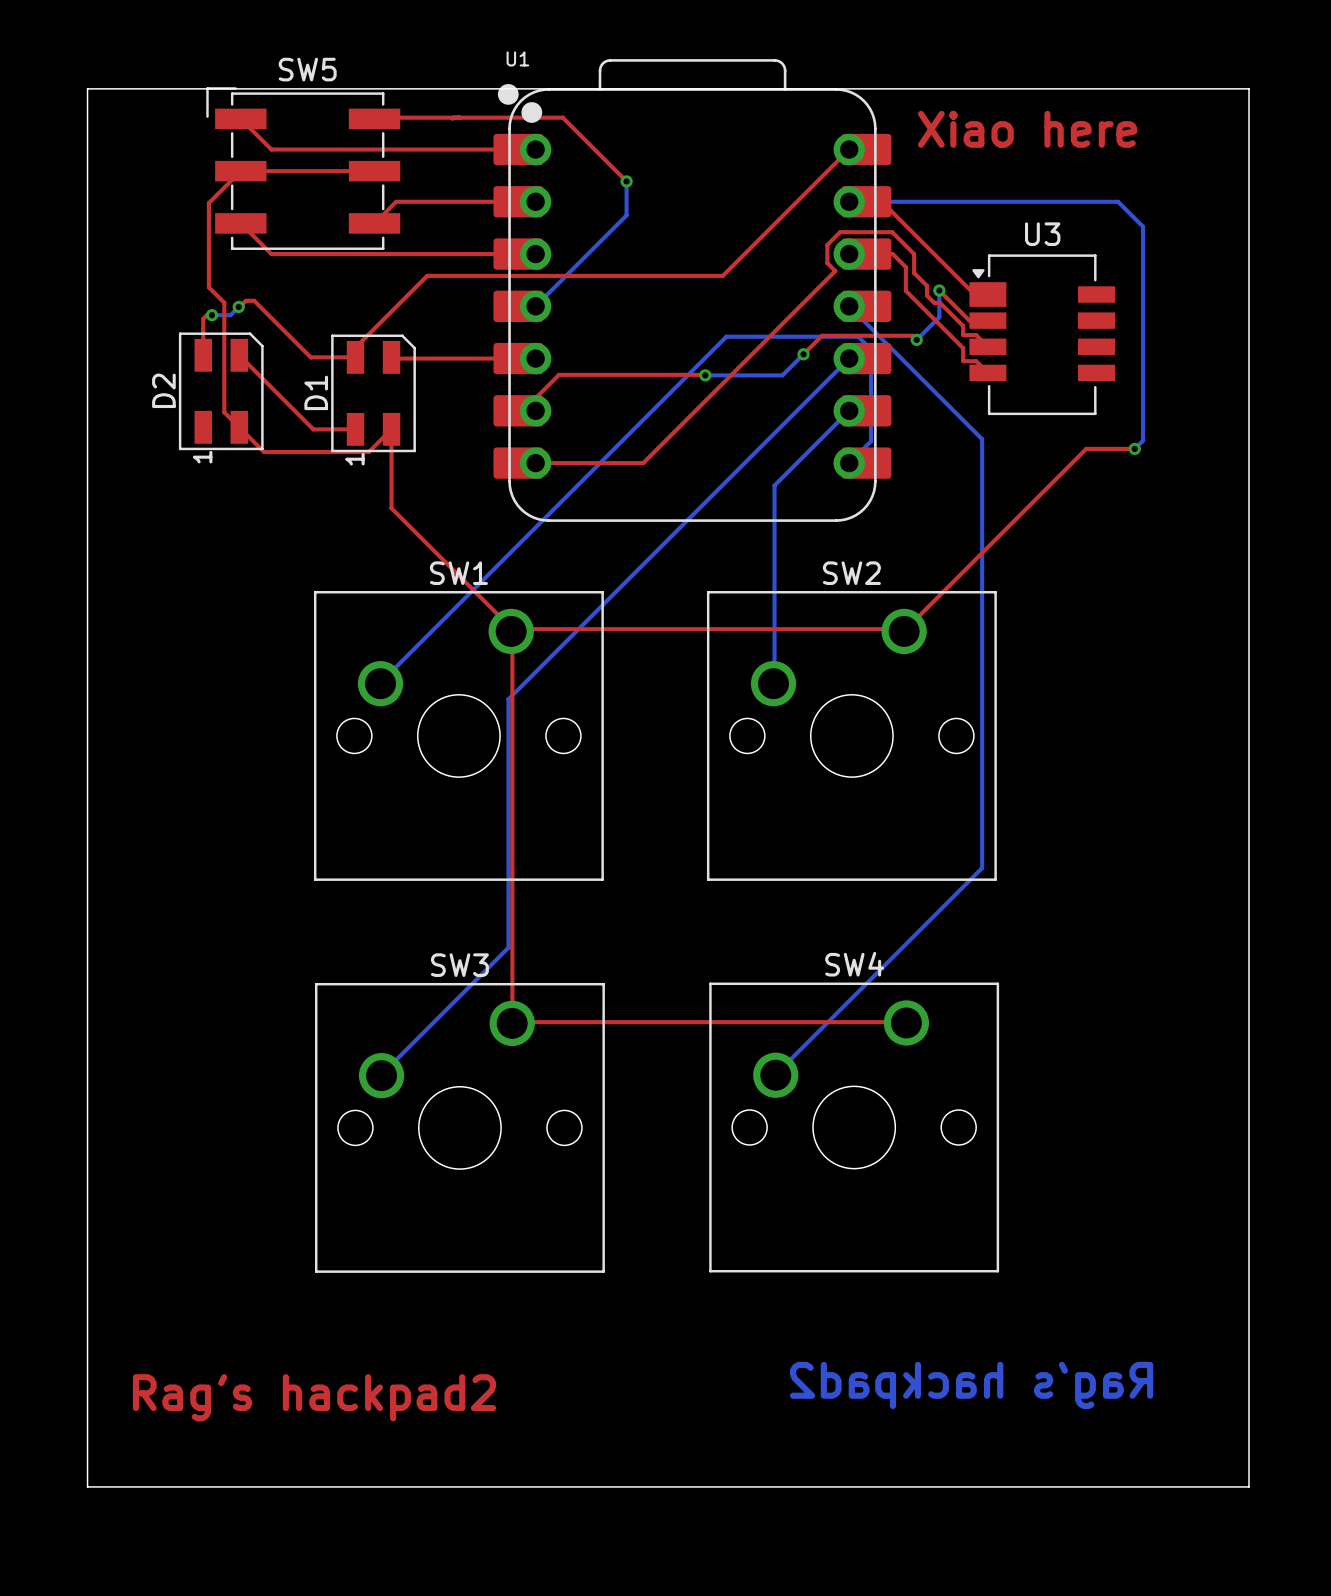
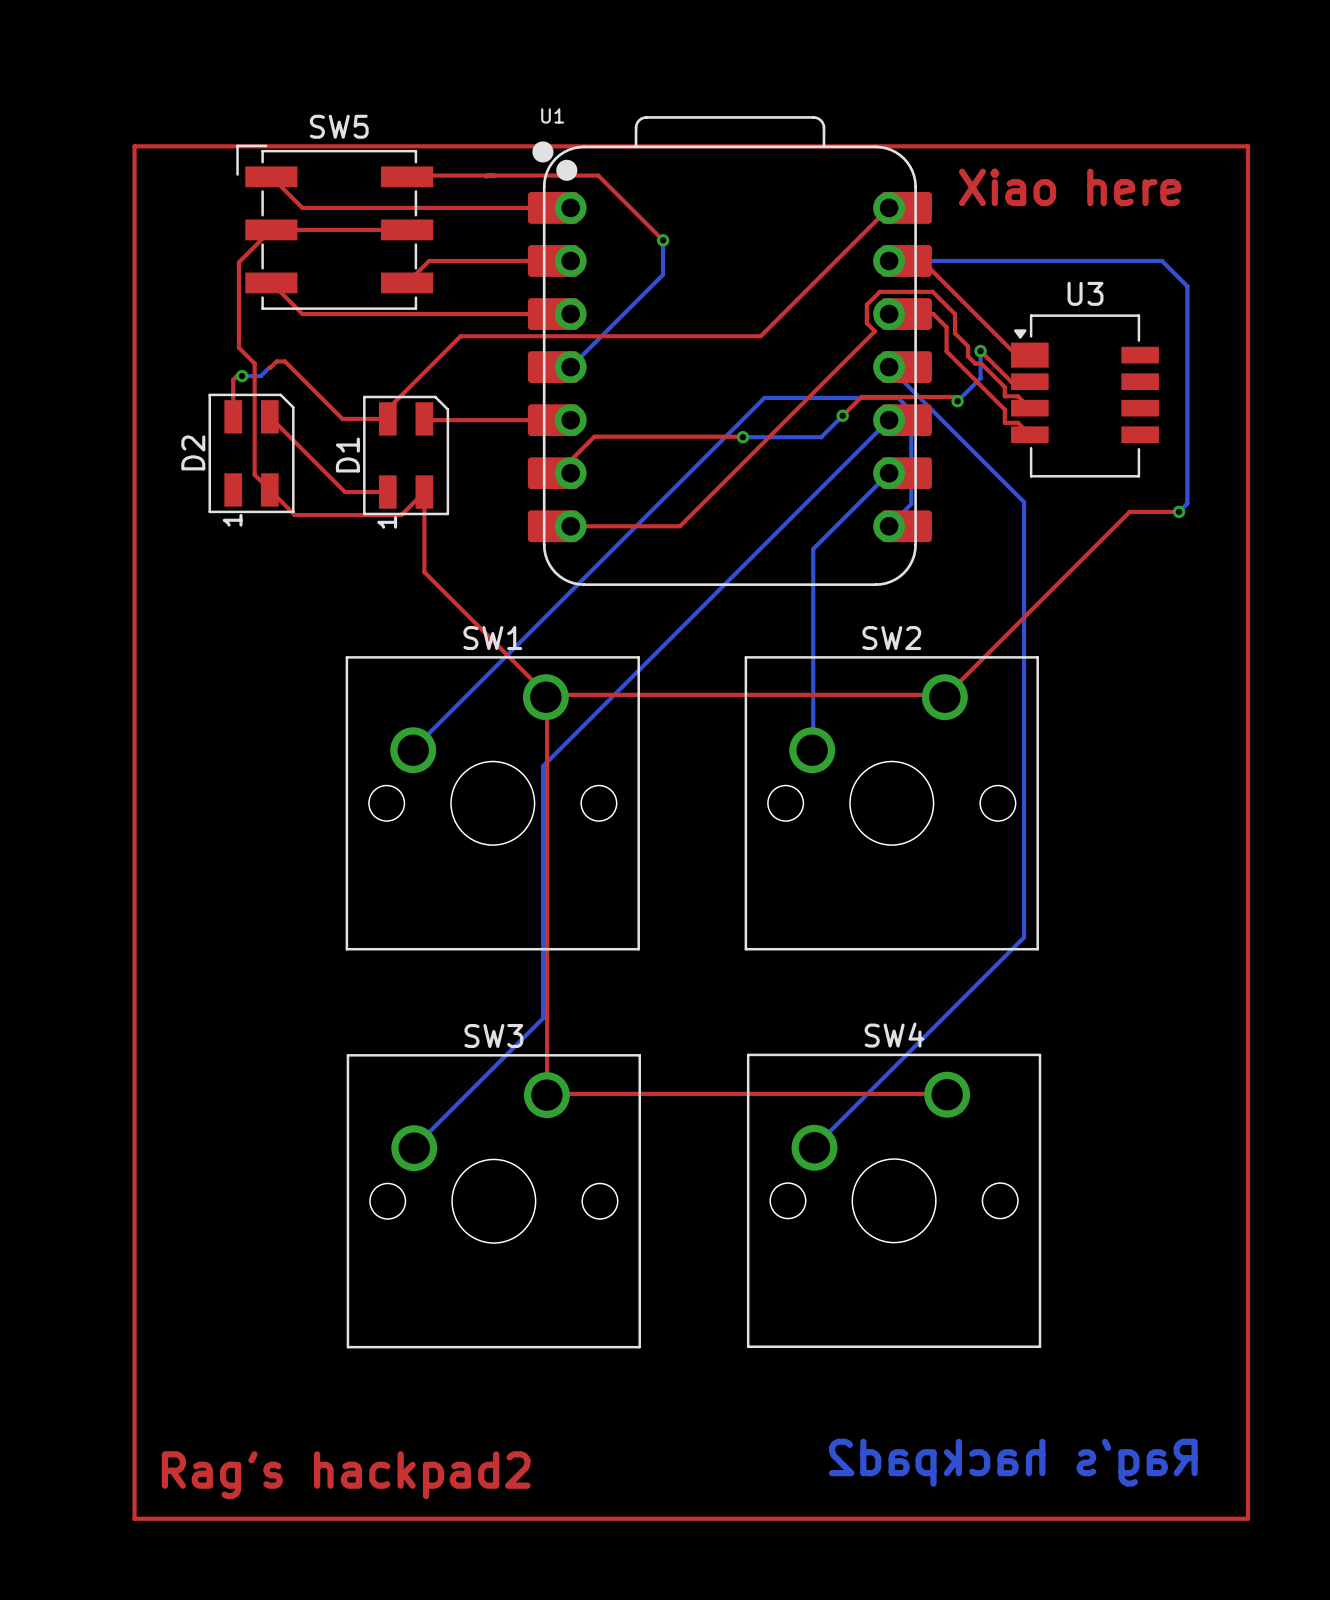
board edge: (87, 88) (1248, 88) (1248, 1486) (87, 1486) (87, 88) -> none
top track: none -> (134, 146) (1247, 146) (1247, 1518) (134, 1518) (134, 146)
via: (238, 306) -> none

